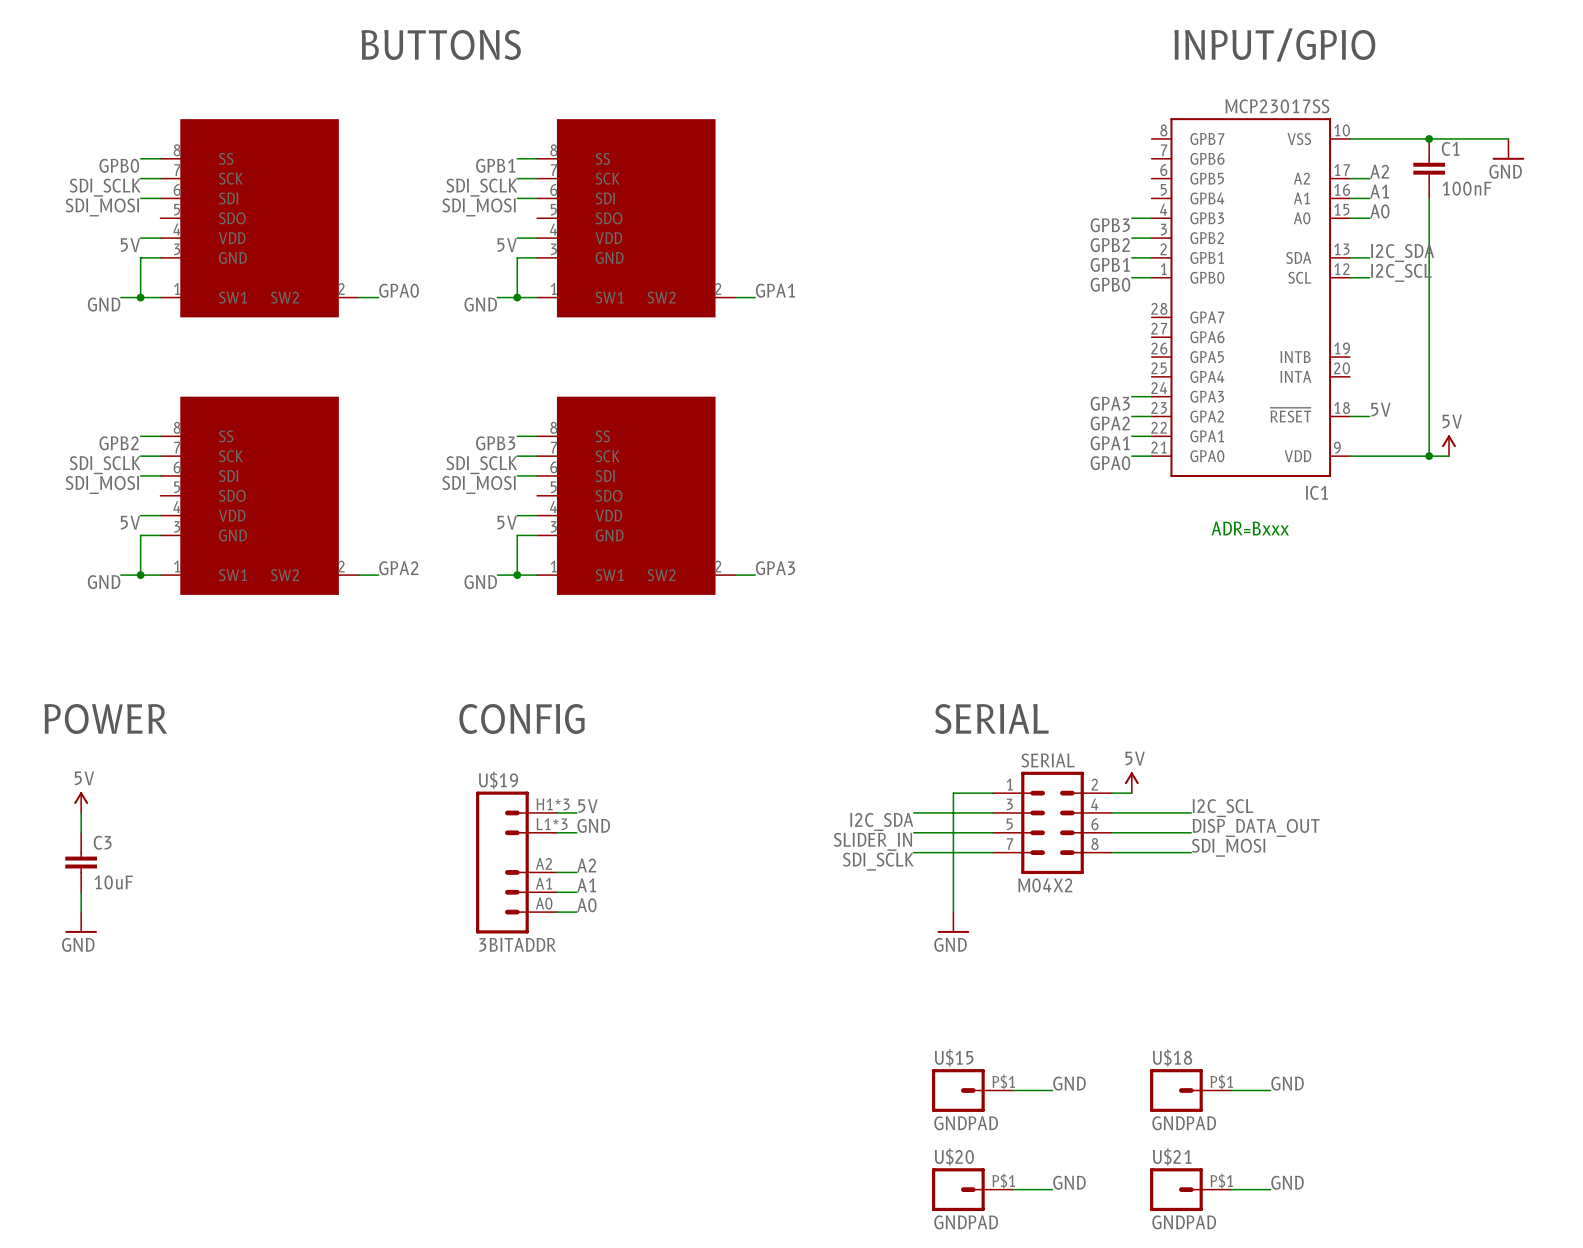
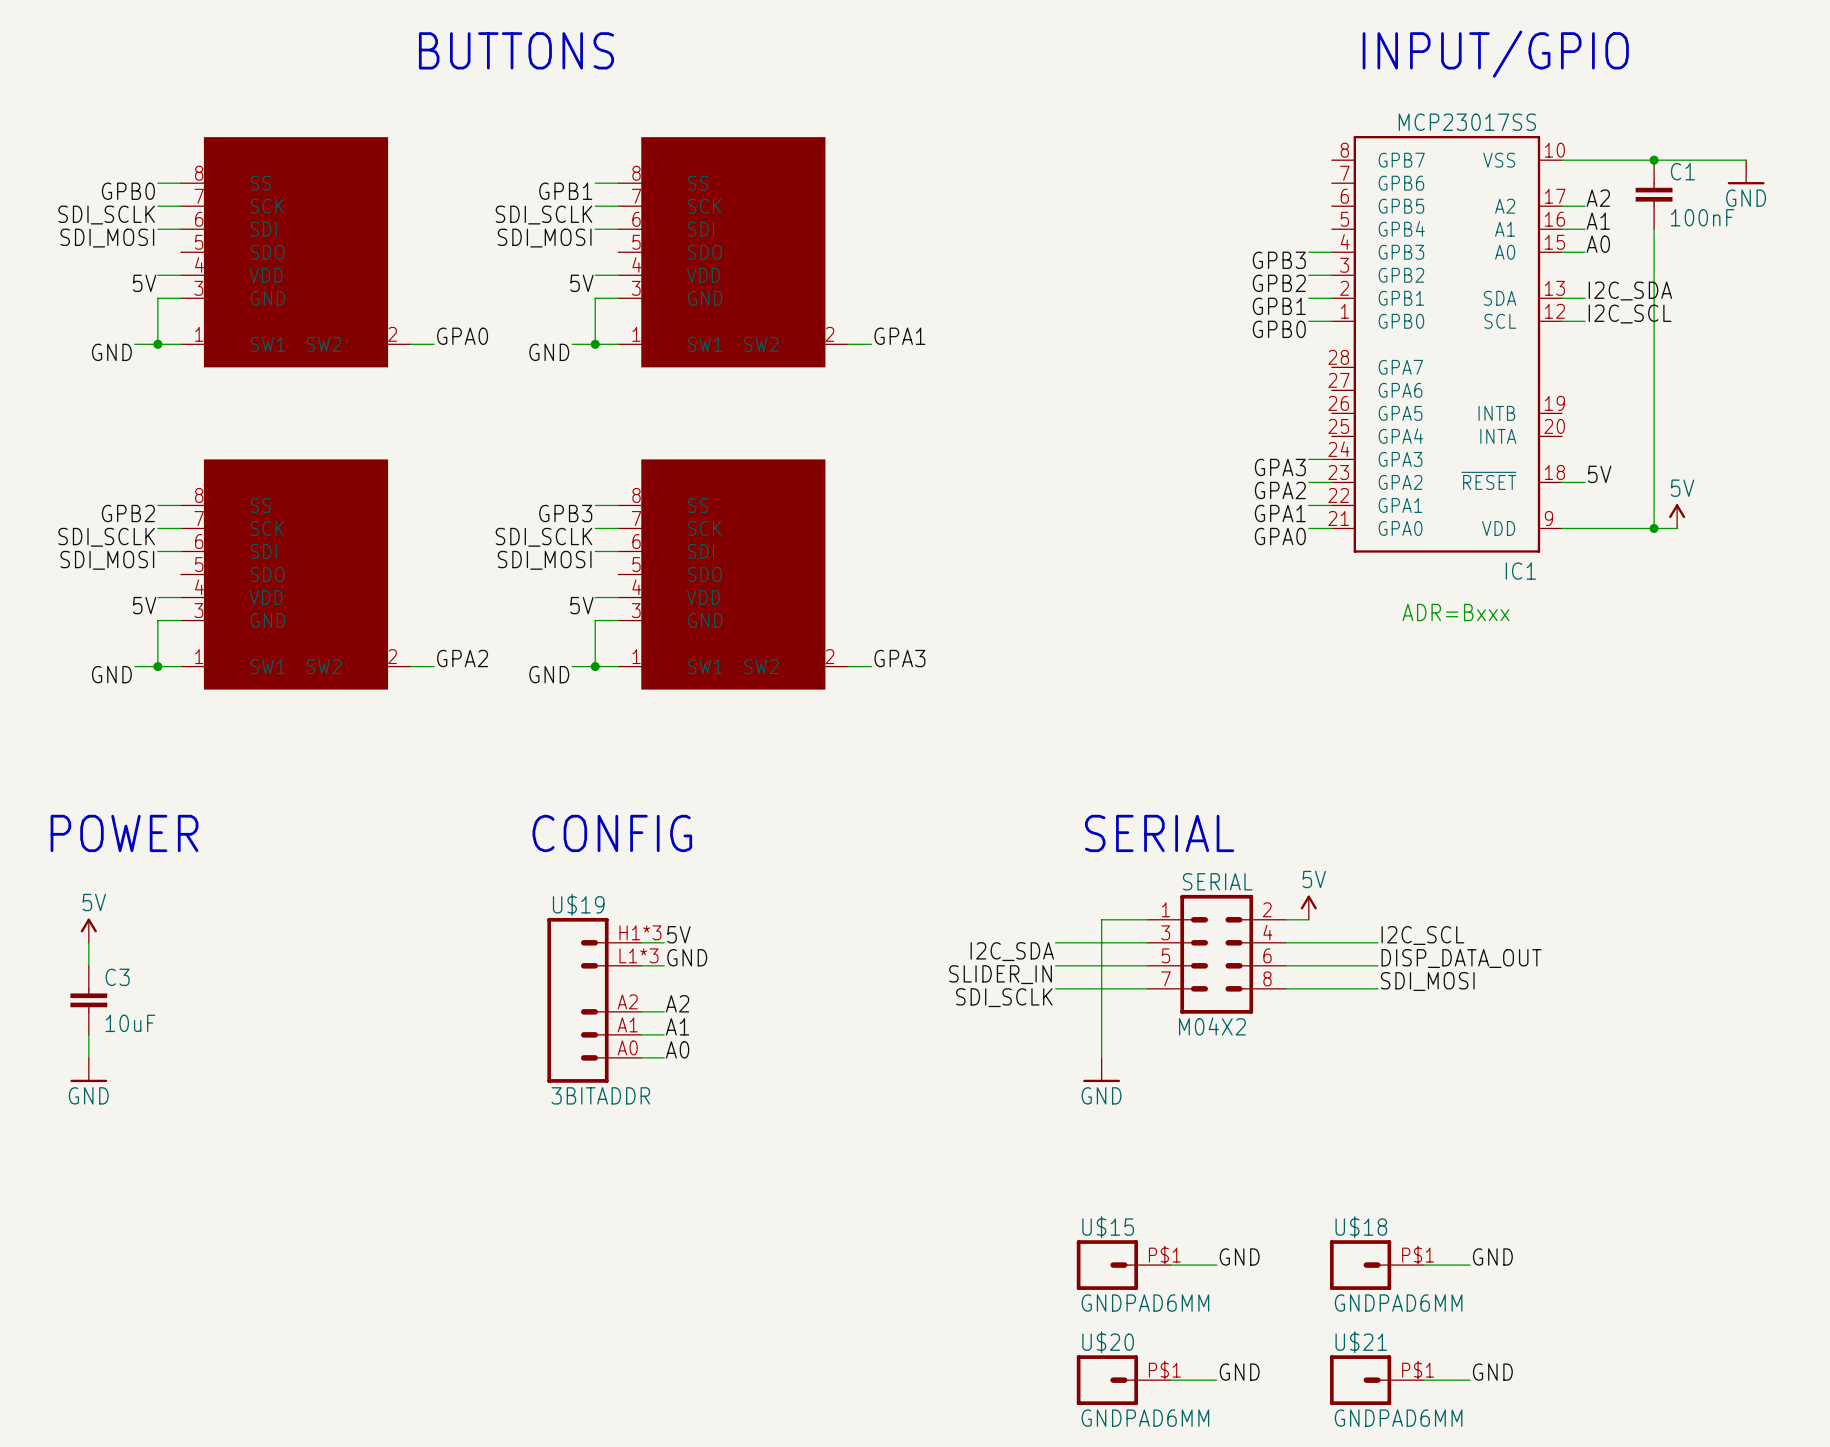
U$15 value: GNDPAD (966, 1123) -> GNDPAD6MM (1145, 1303)
U$18 value: GNDPAD (1184, 1123) -> GNDPAD6MM (1398, 1303)
U$20 value: GNDPAD (966, 1222) -> GNDPAD6MM (1145, 1418)
U$21 value: GNDPAD (1184, 1222) -> GNDPAD6MM (1398, 1418)

